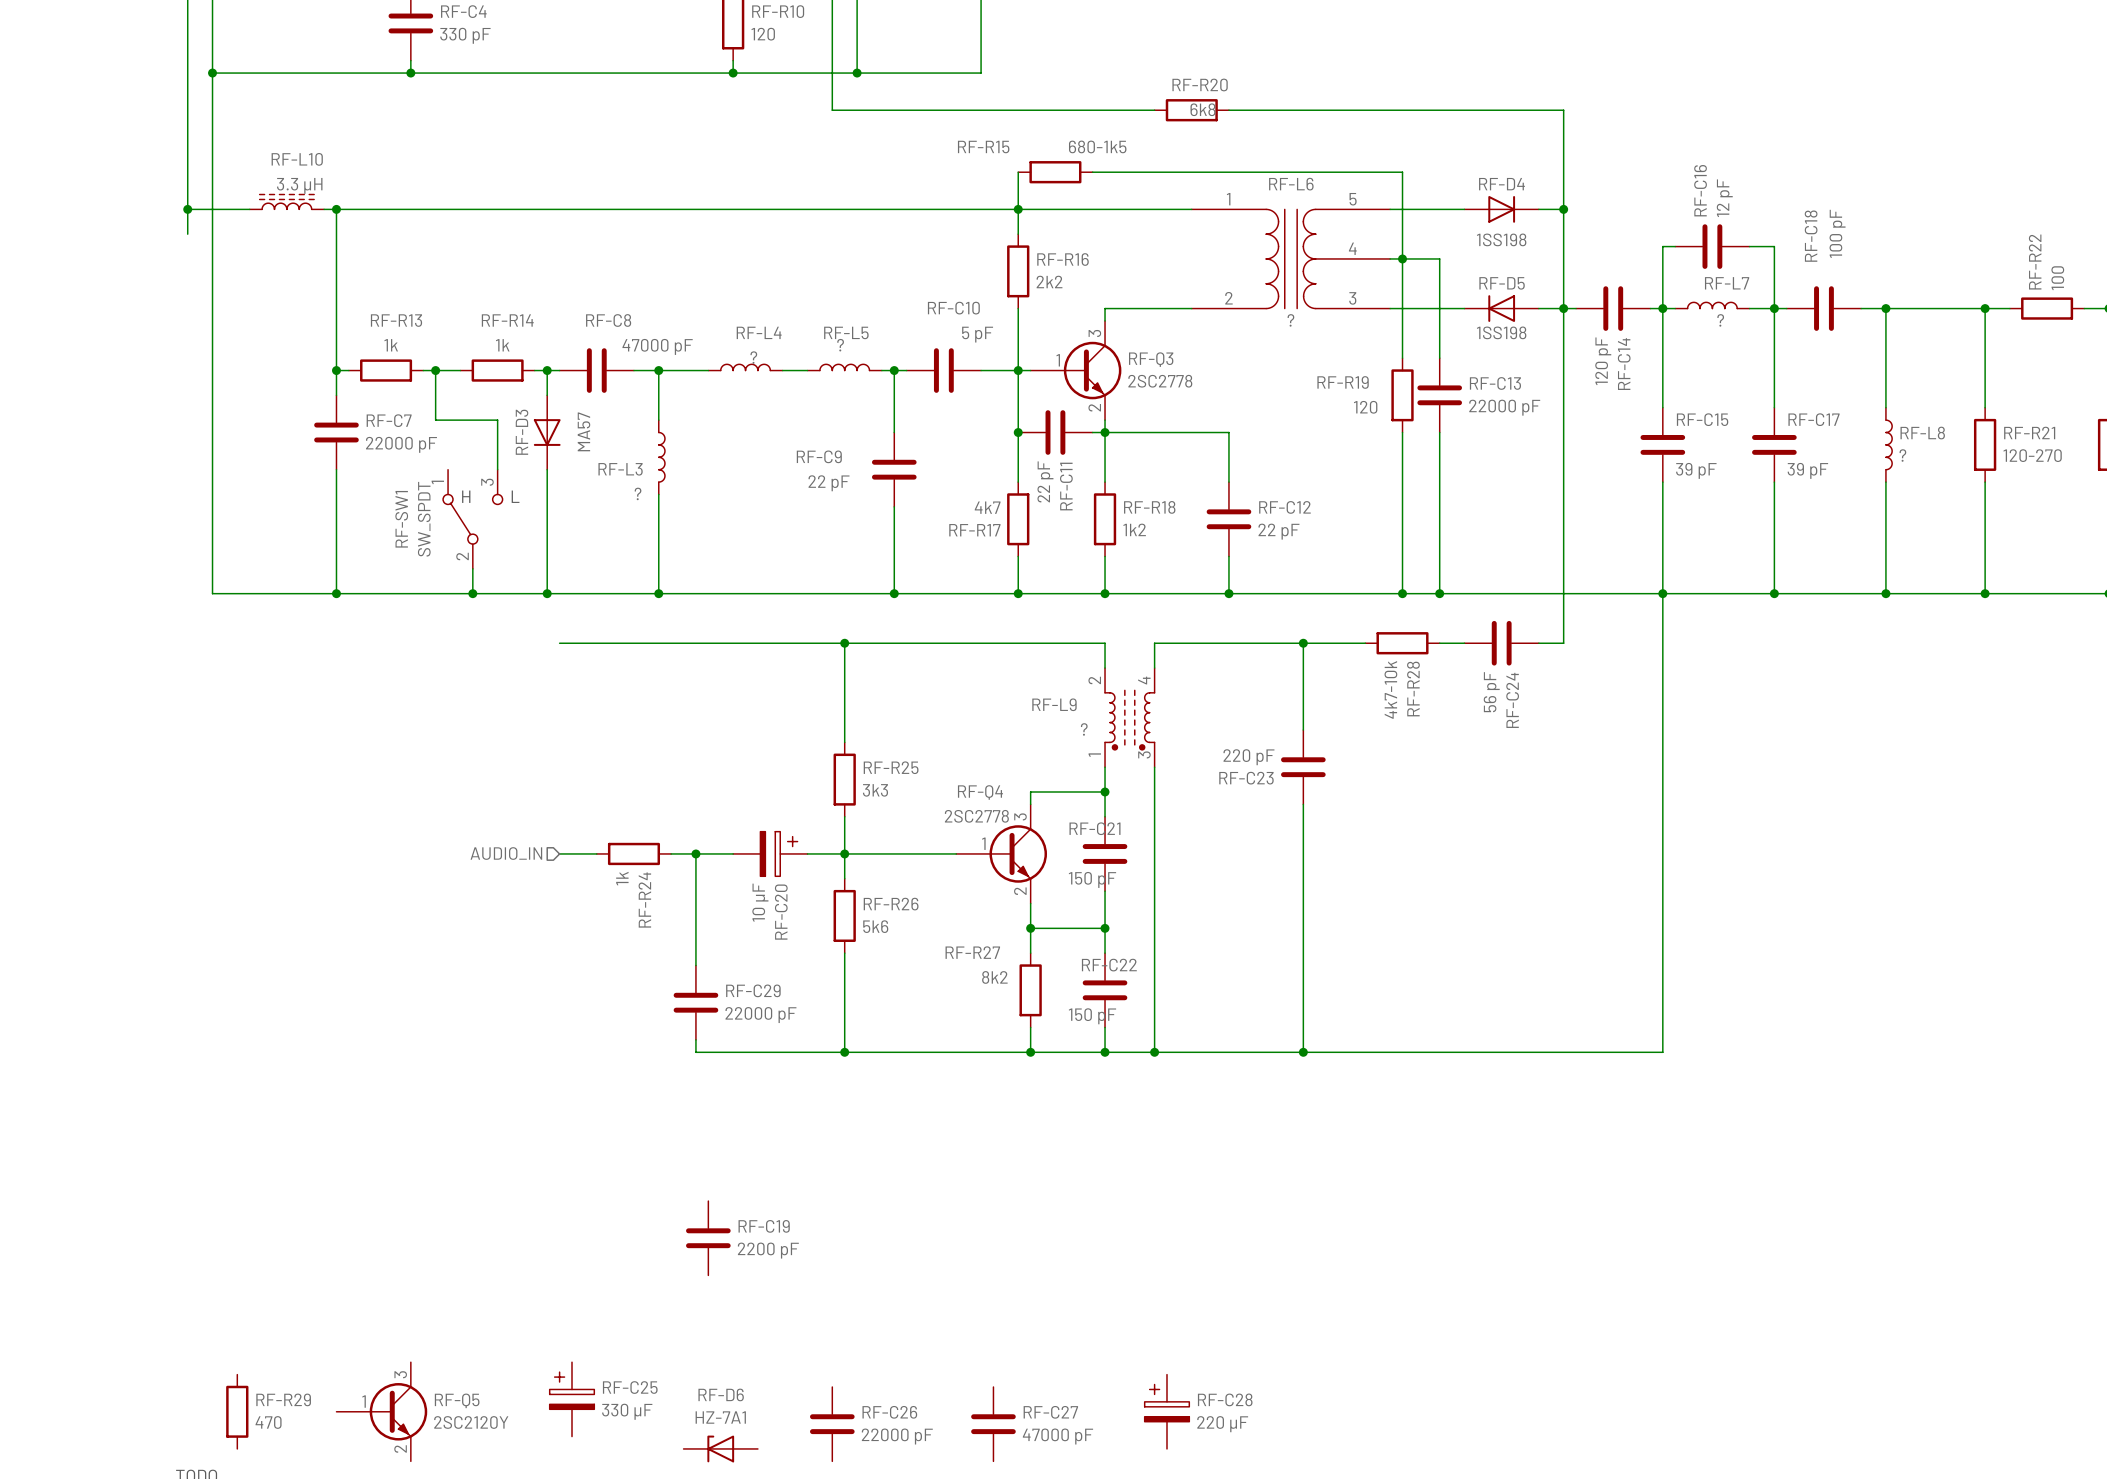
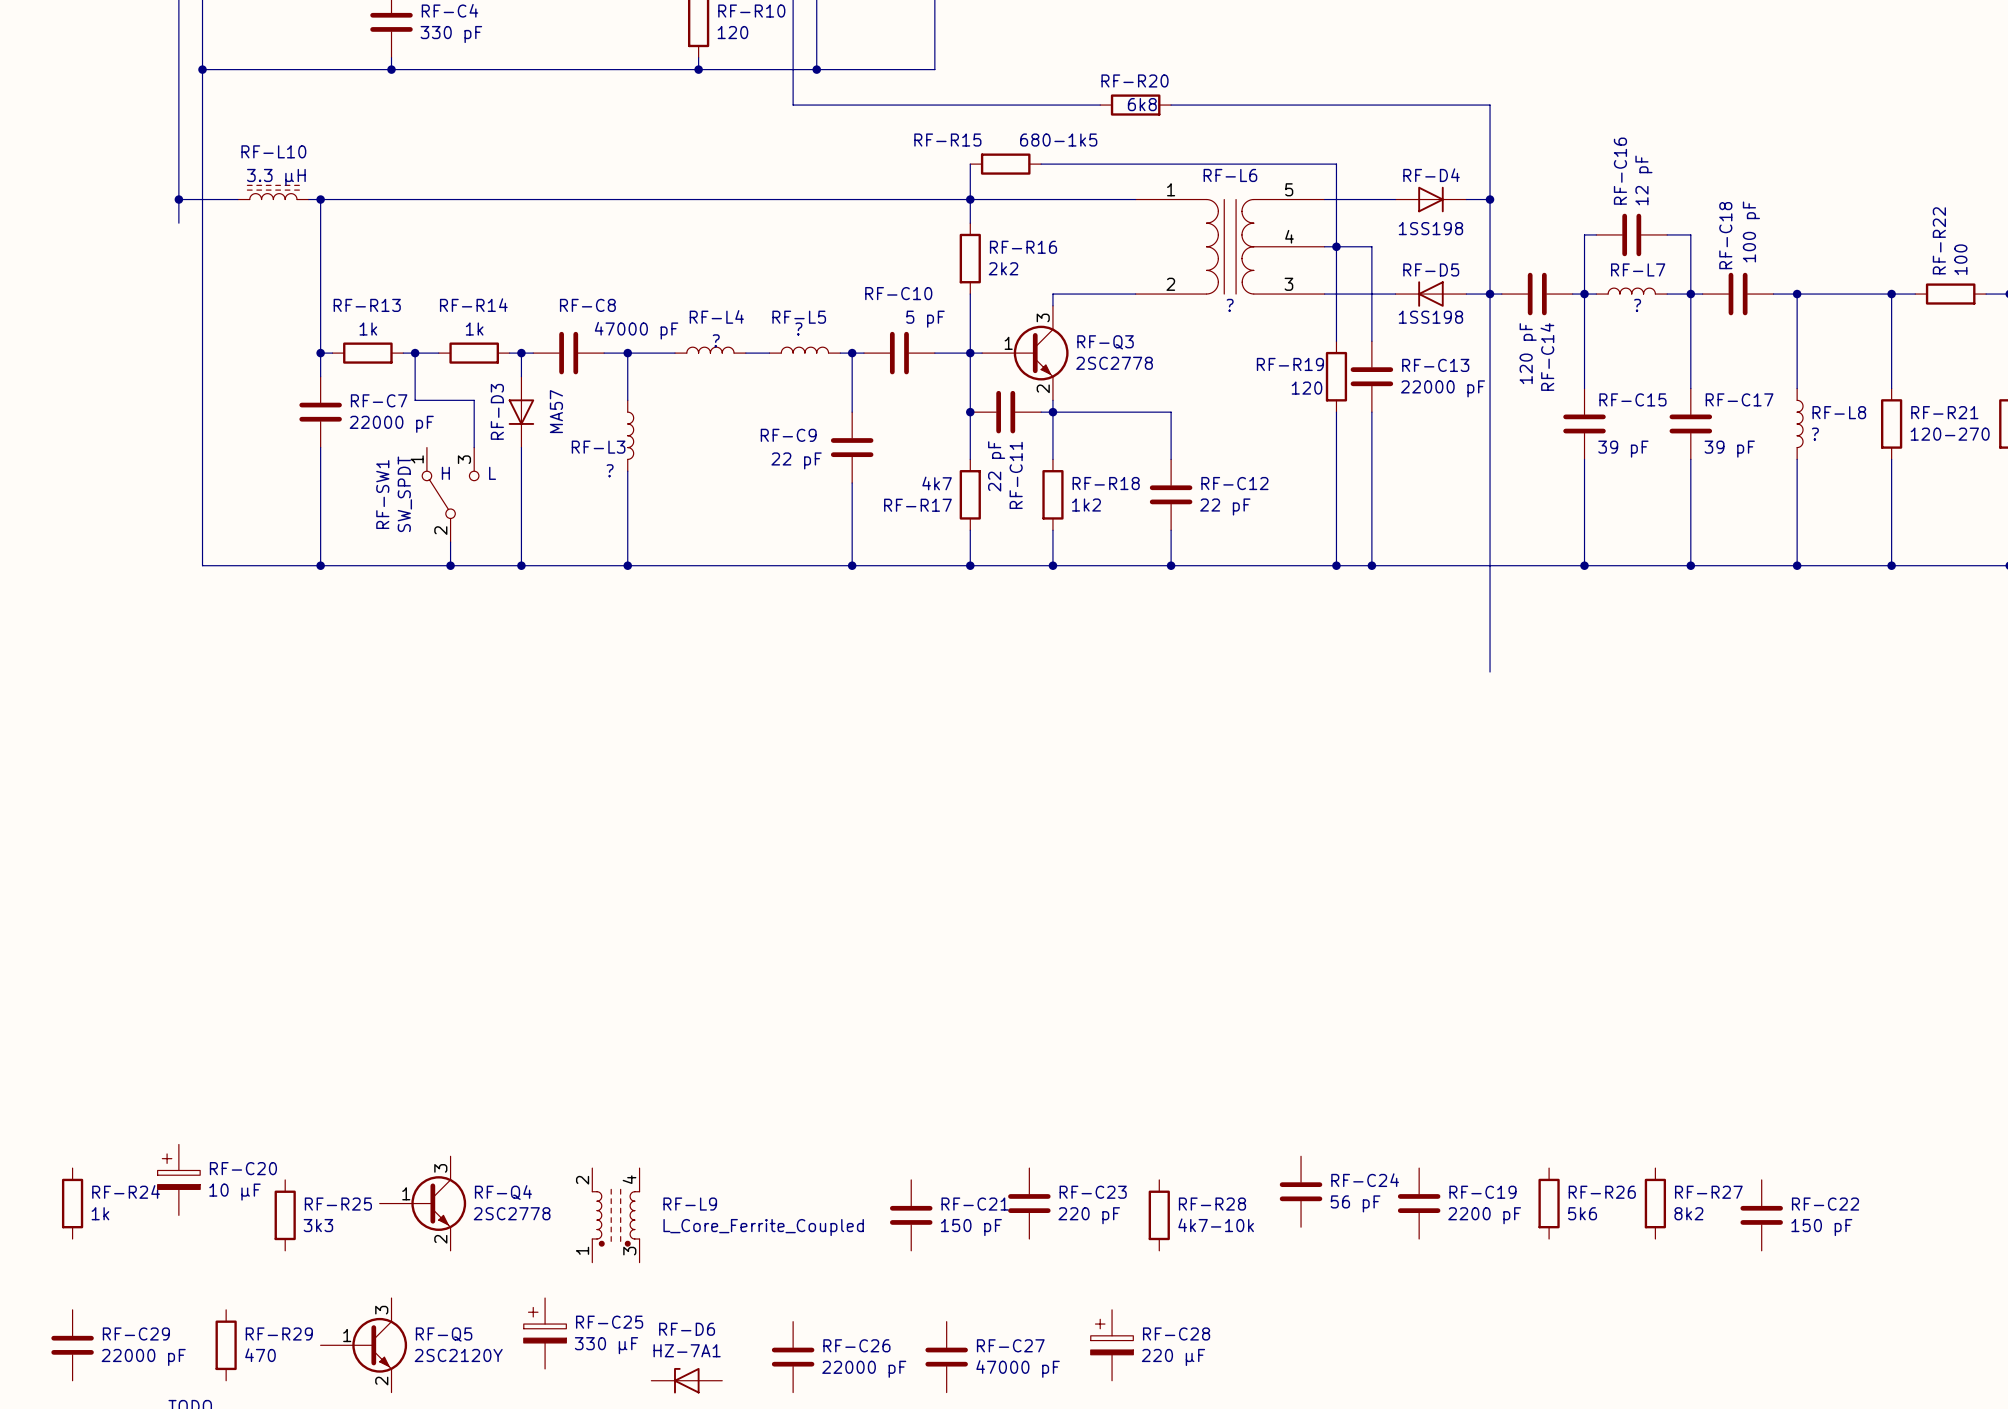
wire: (1662, 593) (1662, 1052) (695, 1052) (695, 1039) -> none
wire: (559, 643) (1105, 643) (1105, 668) -> none
wire: (844, 643) (844, 742) -> none
junction: (844, 643) -> none
wire: (1303, 643) (1303, 730) -> none
junction: (1303, 643) -> none
wire: (1365, 643) (1154, 643) (1154, 668) -> none
RF-R28 rotation: 0° (1402, 643) -> 90° clockwise (1159, 1215)
RF-R28 position: (1402, 643) -> (1159, 1215)
wire: (1439, 643) (1464, 643) -> none
RF-C24 rotation: 0° (1501, 643) -> 90° clockwise (1301, 1191)
RF-C24 position: (1501, 643) -> (1301, 1191)
wire: (1538, 643) (1563, 643) -> (1490, 672) (1490, 612)
RF-R28 value position: 4k7-10k (1390, 689) -> 4k7-10k (1216, 1225)
RF-R28 name position: RF-R28 (1413, 689) -> RF-R28 (1212, 1204)
RF-C24 value position: 56 pF (1491, 692) -> 56 pF (1355, 1203)
RF-C24 name position: RF-C24 (1512, 700) -> RF-C24 (1365, 1180)
RF-L9 name position: RF-L9 (1054, 704) -> RF-L9 (690, 1204)
RF-L9 position: (1129, 717) -> (615, 1215)
RF-L9 value: ? (1084, 729) -> L_Core_Ferrite_Coupled (763, 1227)
RF-C23 value position: 220 pF (1248, 757) -> 220 pF (1089, 1215)
wire: (1105, 767) (1105, 816) -> none
wire: (1154, 767) (1154, 1052) -> none
RF-C23 position: (1303, 767) -> (1029, 1203)
RF-C23 name position: RF-C23 (1246, 778) -> RF-C23 (1093, 1192)
RF-R25 position: (844, 779) -> (285, 1215)
wire: (1105, 791) (1030, 791) (1030, 804) -> none
junction: (1105, 791) -> none
RF-Q4 name position: RF-Q4 (980, 792) -> RF-Q4 (503, 1192)
wire: (1303, 804) (1303, 1052) -> none
wire: (844, 816) (844, 878) -> none
RF-Q4 value position: 2SC2778 (976, 816) -> 2SC2778 (512, 1213)
RF-C21 name position: RF-C21 (1094, 828) -> RF-C21 (975, 1204)
hierarchical label: AUDIO_IN (506, 853) -> none
wire: (559, 853) (596, 853) -> none
RF-R24 rotation: 0° (633, 853) -> 90° clockwise (72, 1203)
RF-R24 position: (633, 853) -> (72, 1203)
wire: (671, 853) (733, 853) -> none
wire: (695, 853) (695, 965) -> none
junction: (695, 853) -> none
RF-C20 position: (770, 853) -> (178, 1179)
RF-C20 rotation: 0° (779, 853) -> 90° counterclockwise (178, 1171)
wire: (807, 853) (956, 853) -> none
junction: (844, 853) -> none
RF-Q4 position: (1001, 853) -> (422, 1203)
RF-C21 position: (1105, 853) -> (911, 1215)
RF-R24 value position: 1k (622, 878) -> 1k (100, 1213)
RF-C21 value position: 150 pF (1092, 879) -> 150 pF (971, 1227)
wire: (1105, 891) (1105, 953) -> none
RF-R24 name position: RF-R24 (644, 900) -> RF-R24 (126, 1191)
wire: (1030, 903) (1030, 953) -> none
RF-R26 position: (844, 915) -> (1549, 1203)
wire: (1030, 928) (1105, 928) -> none
junction: (1030, 928) -> none
junction: (1105, 928) -> none
RF-R27 name position: RF-R27 (972, 952) -> RF-R27 (1708, 1192)
wire: (844, 953) (844, 1052) -> none
RF-C22 name position: RF-C22 (1109, 965) -> RF-C22 (1825, 1204)
RF-R27 value position: 8k2 (994, 977) -> 8k2 (1688, 1213)
RF-R27 position: (1030, 990) -> (1655, 1203)
RF-C22 position: (1105, 990) -> (1761, 1215)
RF-C29 position: (695, 1002) -> (72, 1345)
RF-C22 value position: 150 pF (1092, 1016) -> 150 pF (1821, 1227)
wire: (1030, 1027) (1030, 1052) -> none
wire: (1105, 1027) (1105, 1052) -> none
junction: (844, 1052) -> none
junction: (1030, 1052) -> none
junction: (1105, 1052) -> none
junction: (1154, 1052) -> none
junction: (1303, 1052) -> none
RF-C19 position: (708, 1238) -> (1419, 1203)

